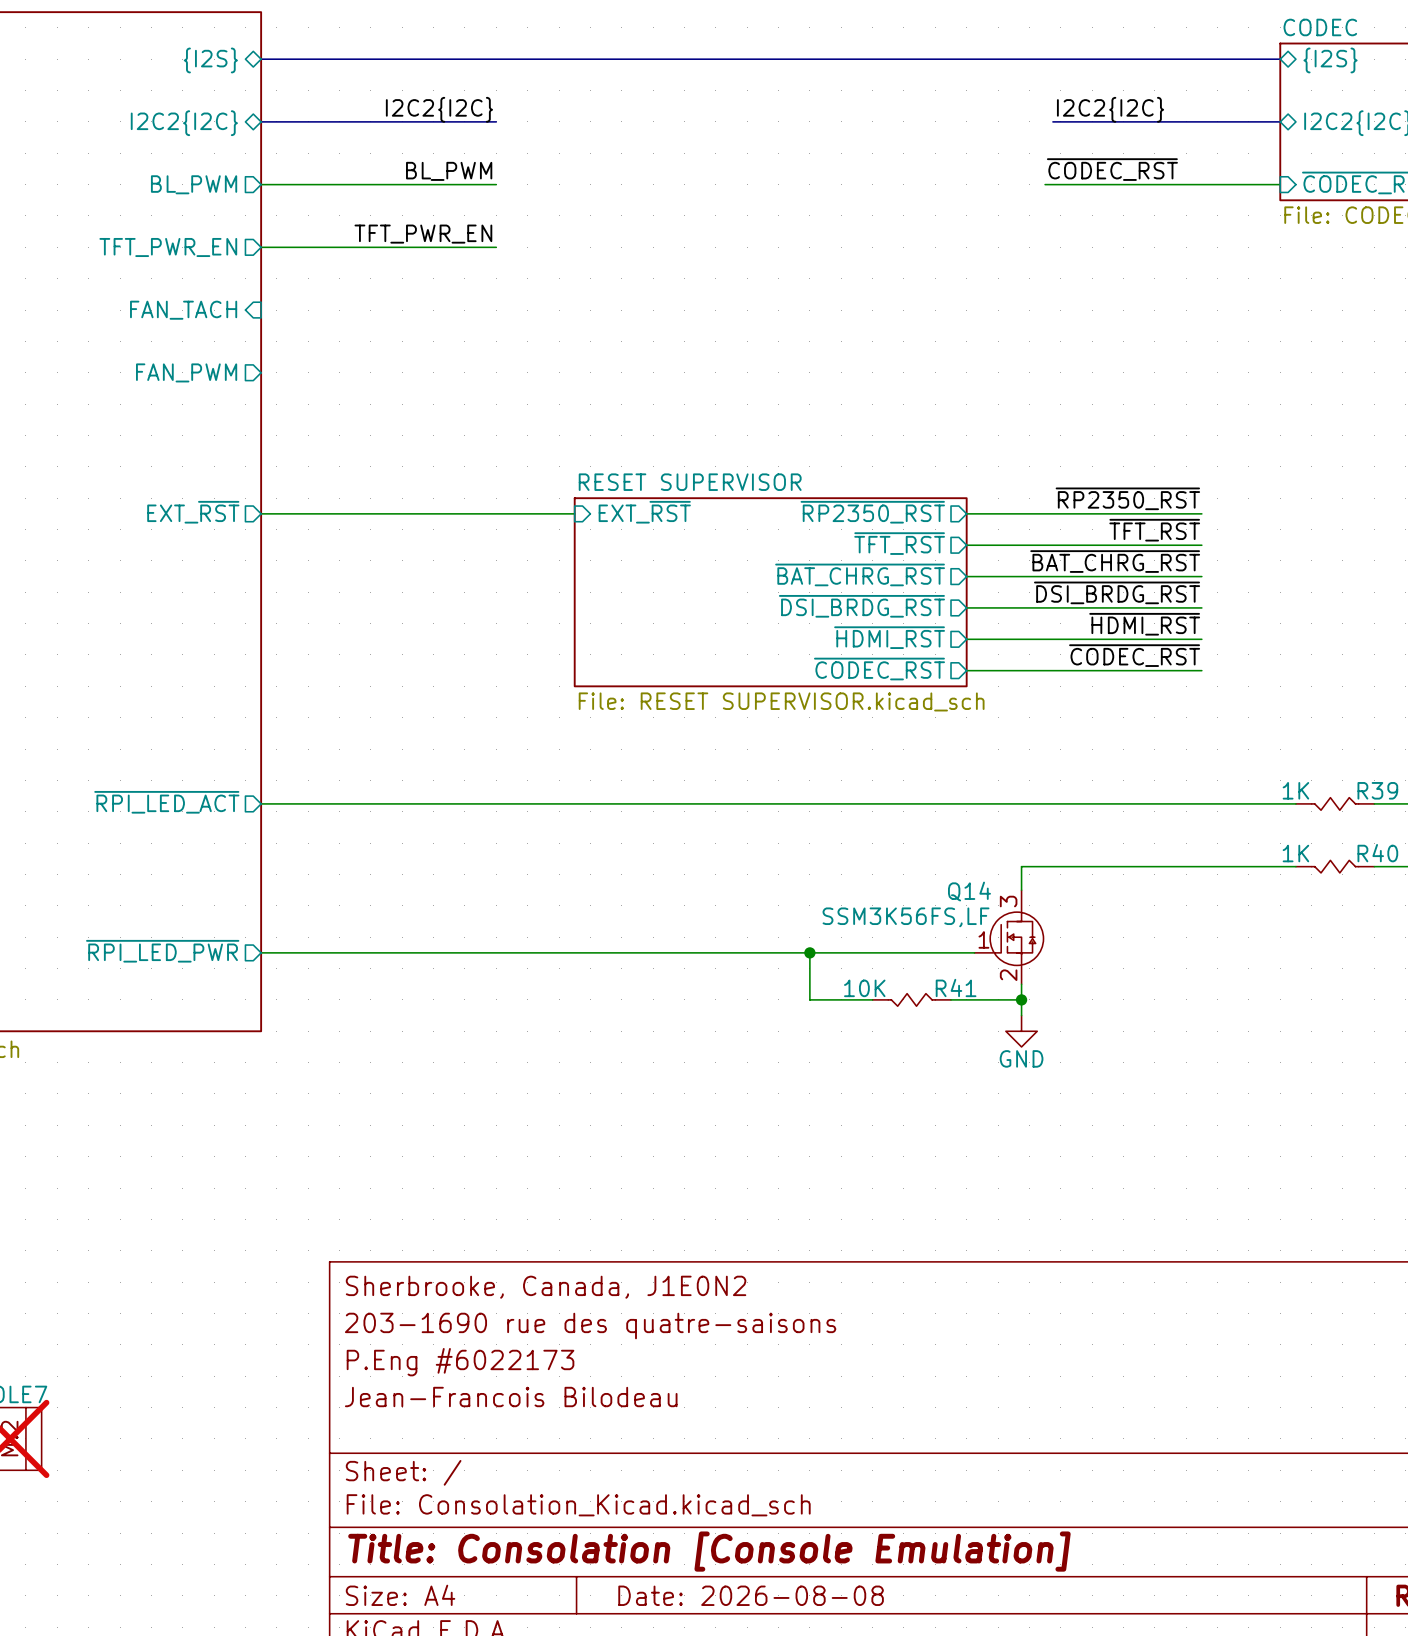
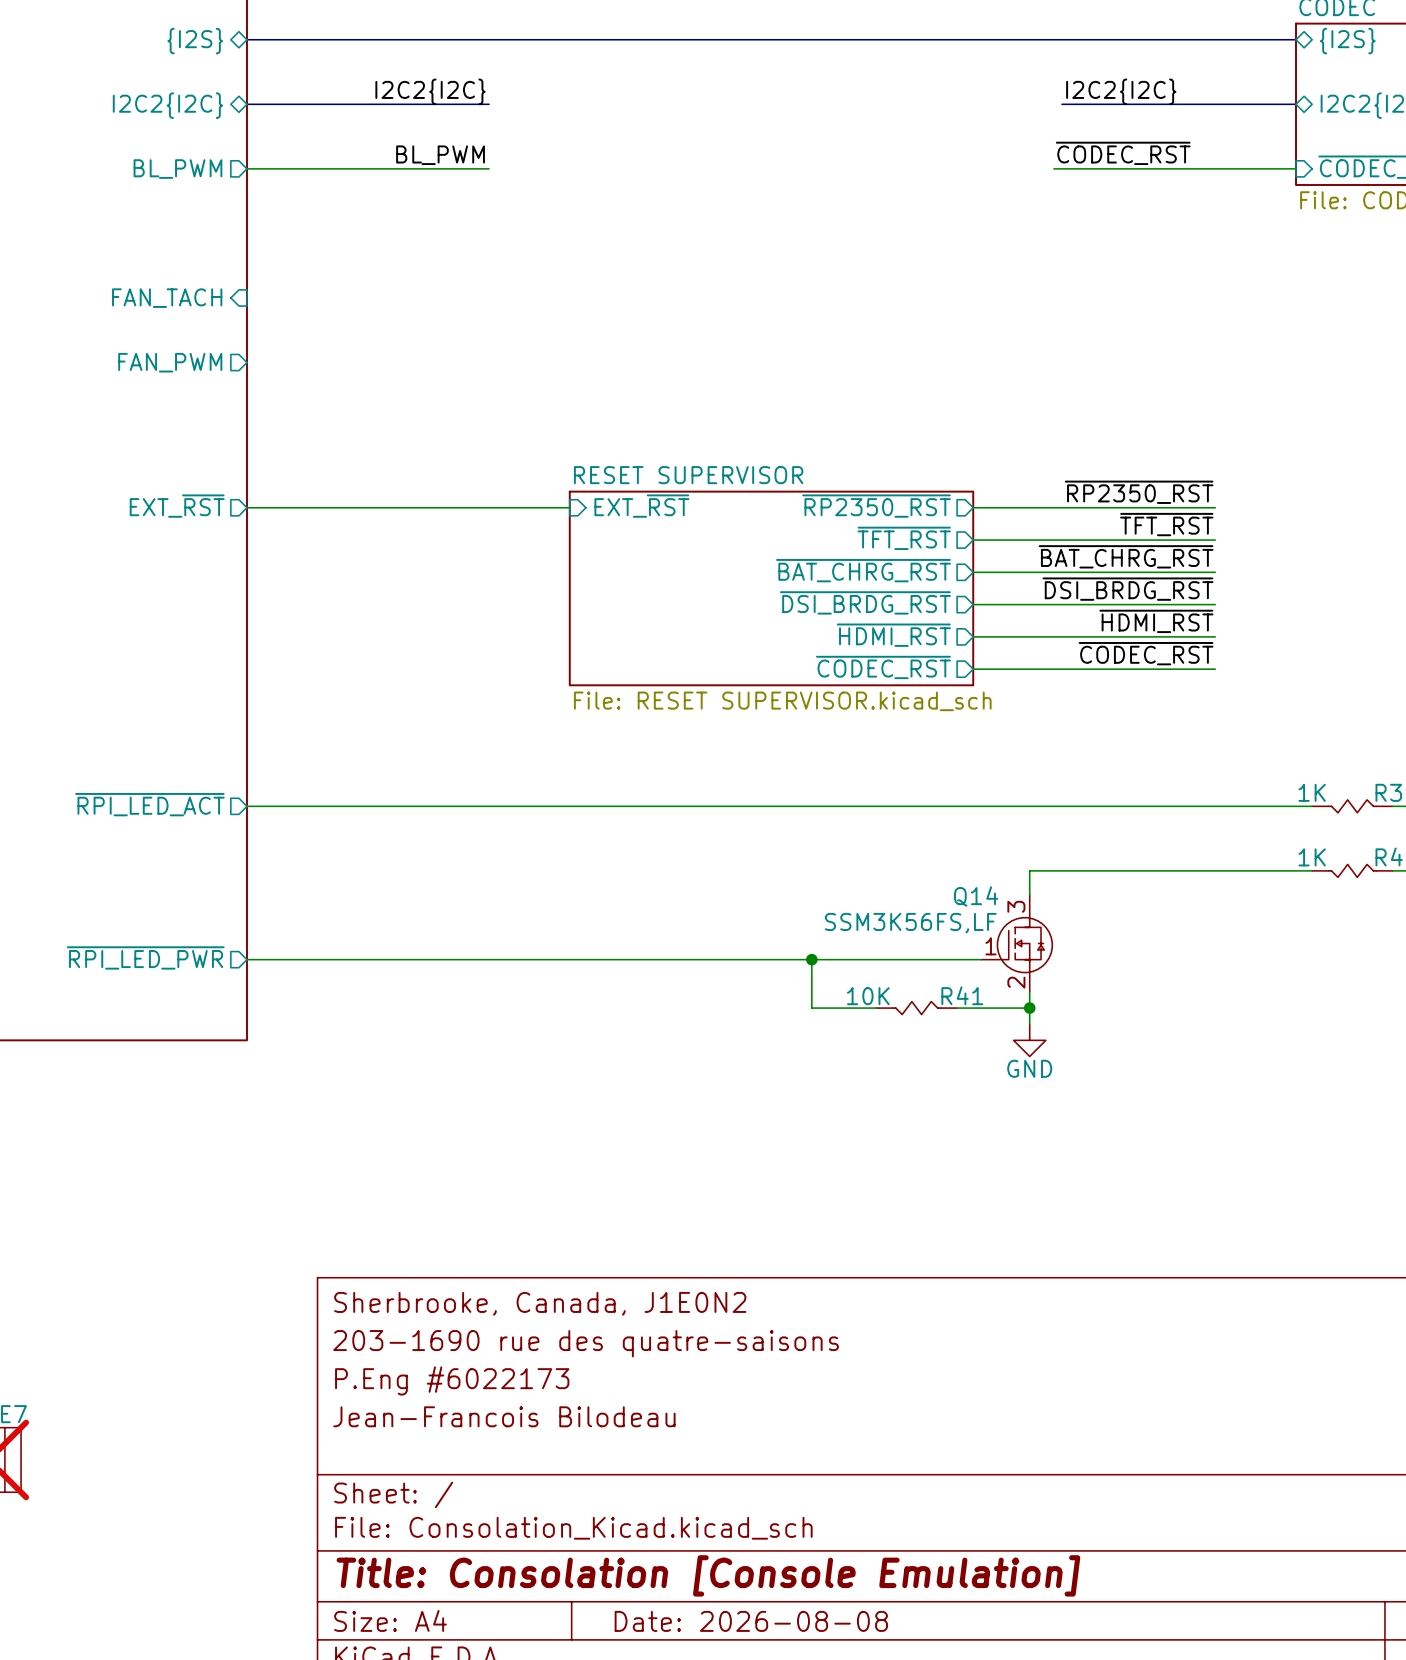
label: TFT_PWR_EN (423, 234) -> none
sheet pin: TFT_PWR_EN (168, 247) -> none
wire: (261, 247) (496, 247) -> none

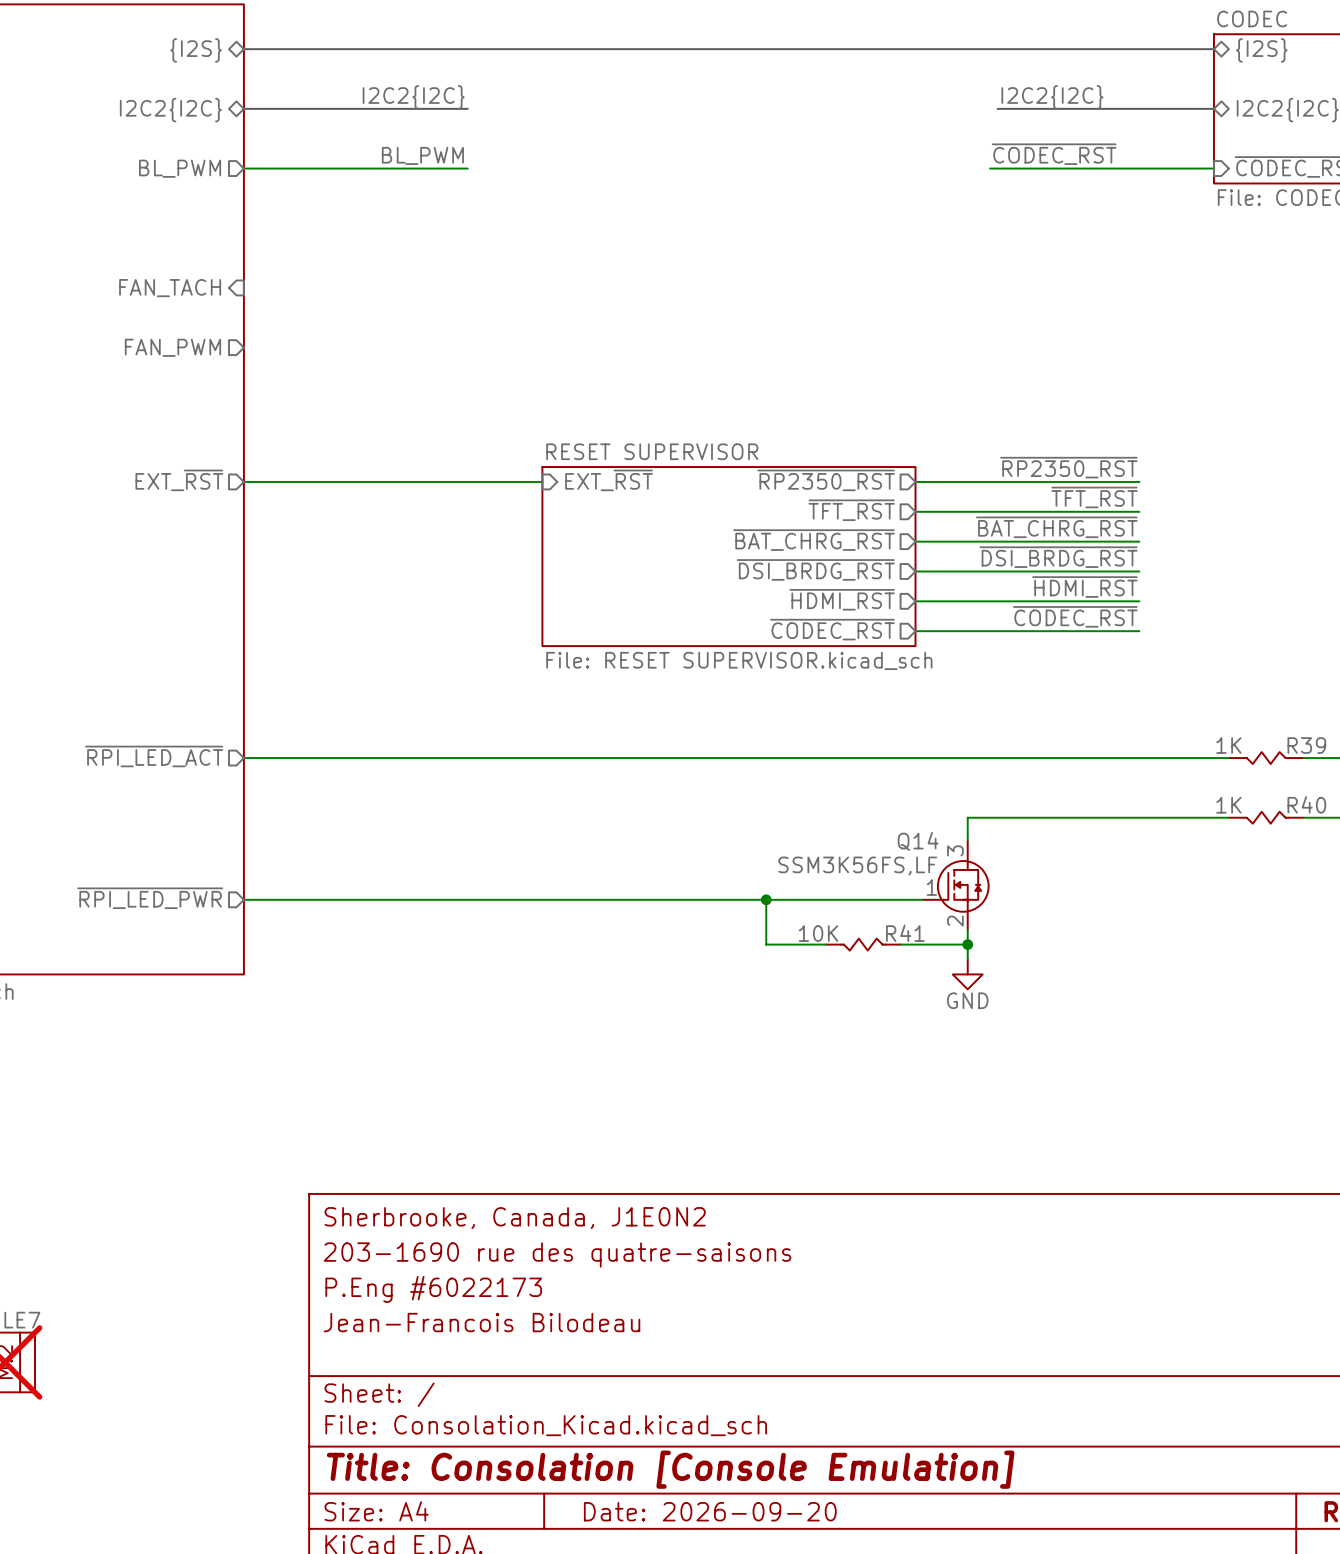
title block: Date: 2026-08-08 (751, 1621) -> Date: 2026-09-20 (710, 1511)

